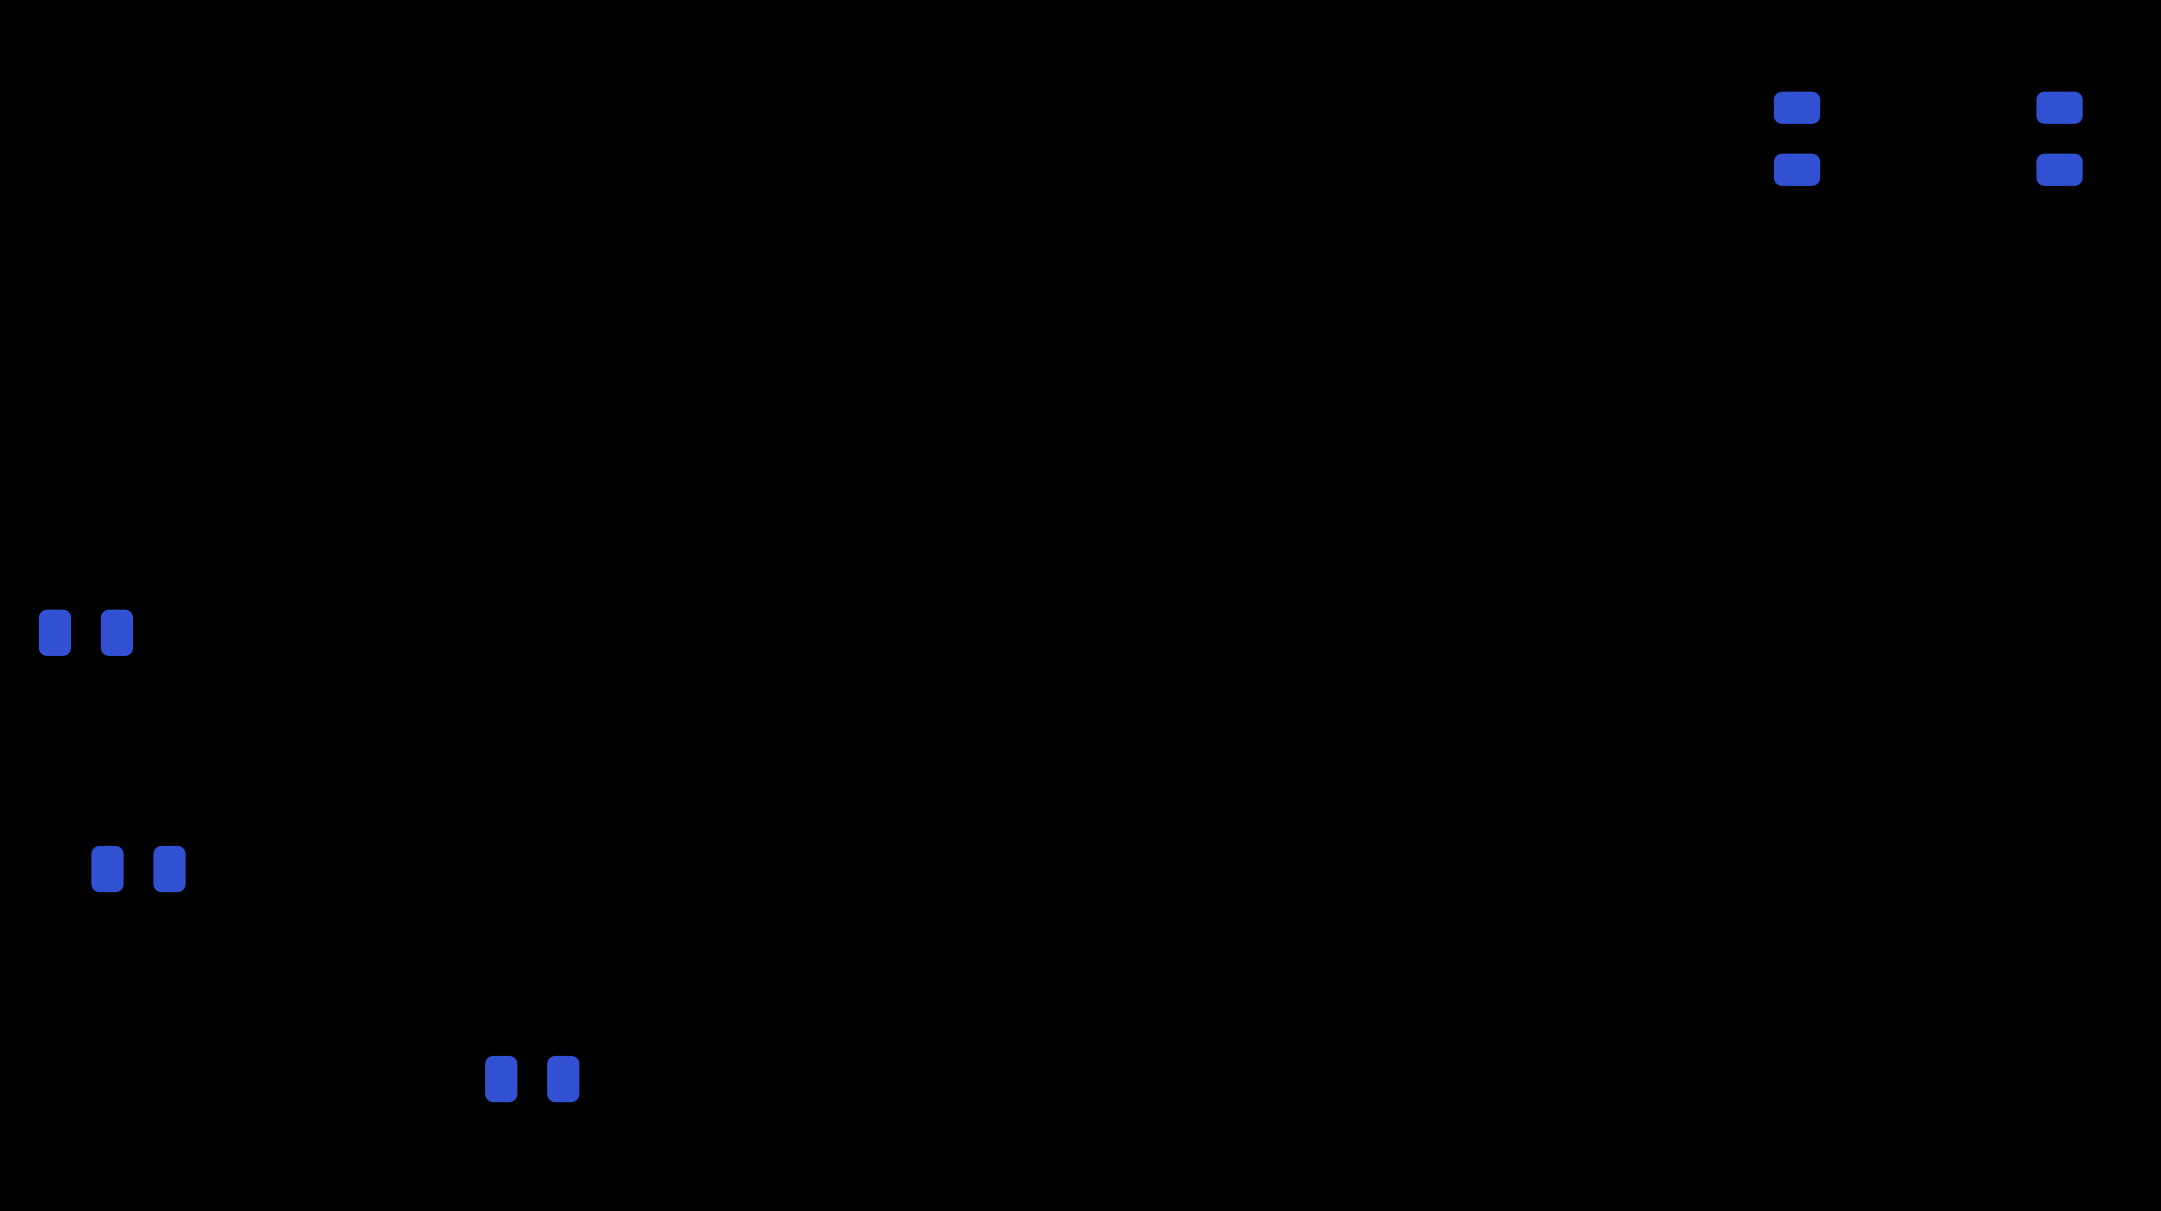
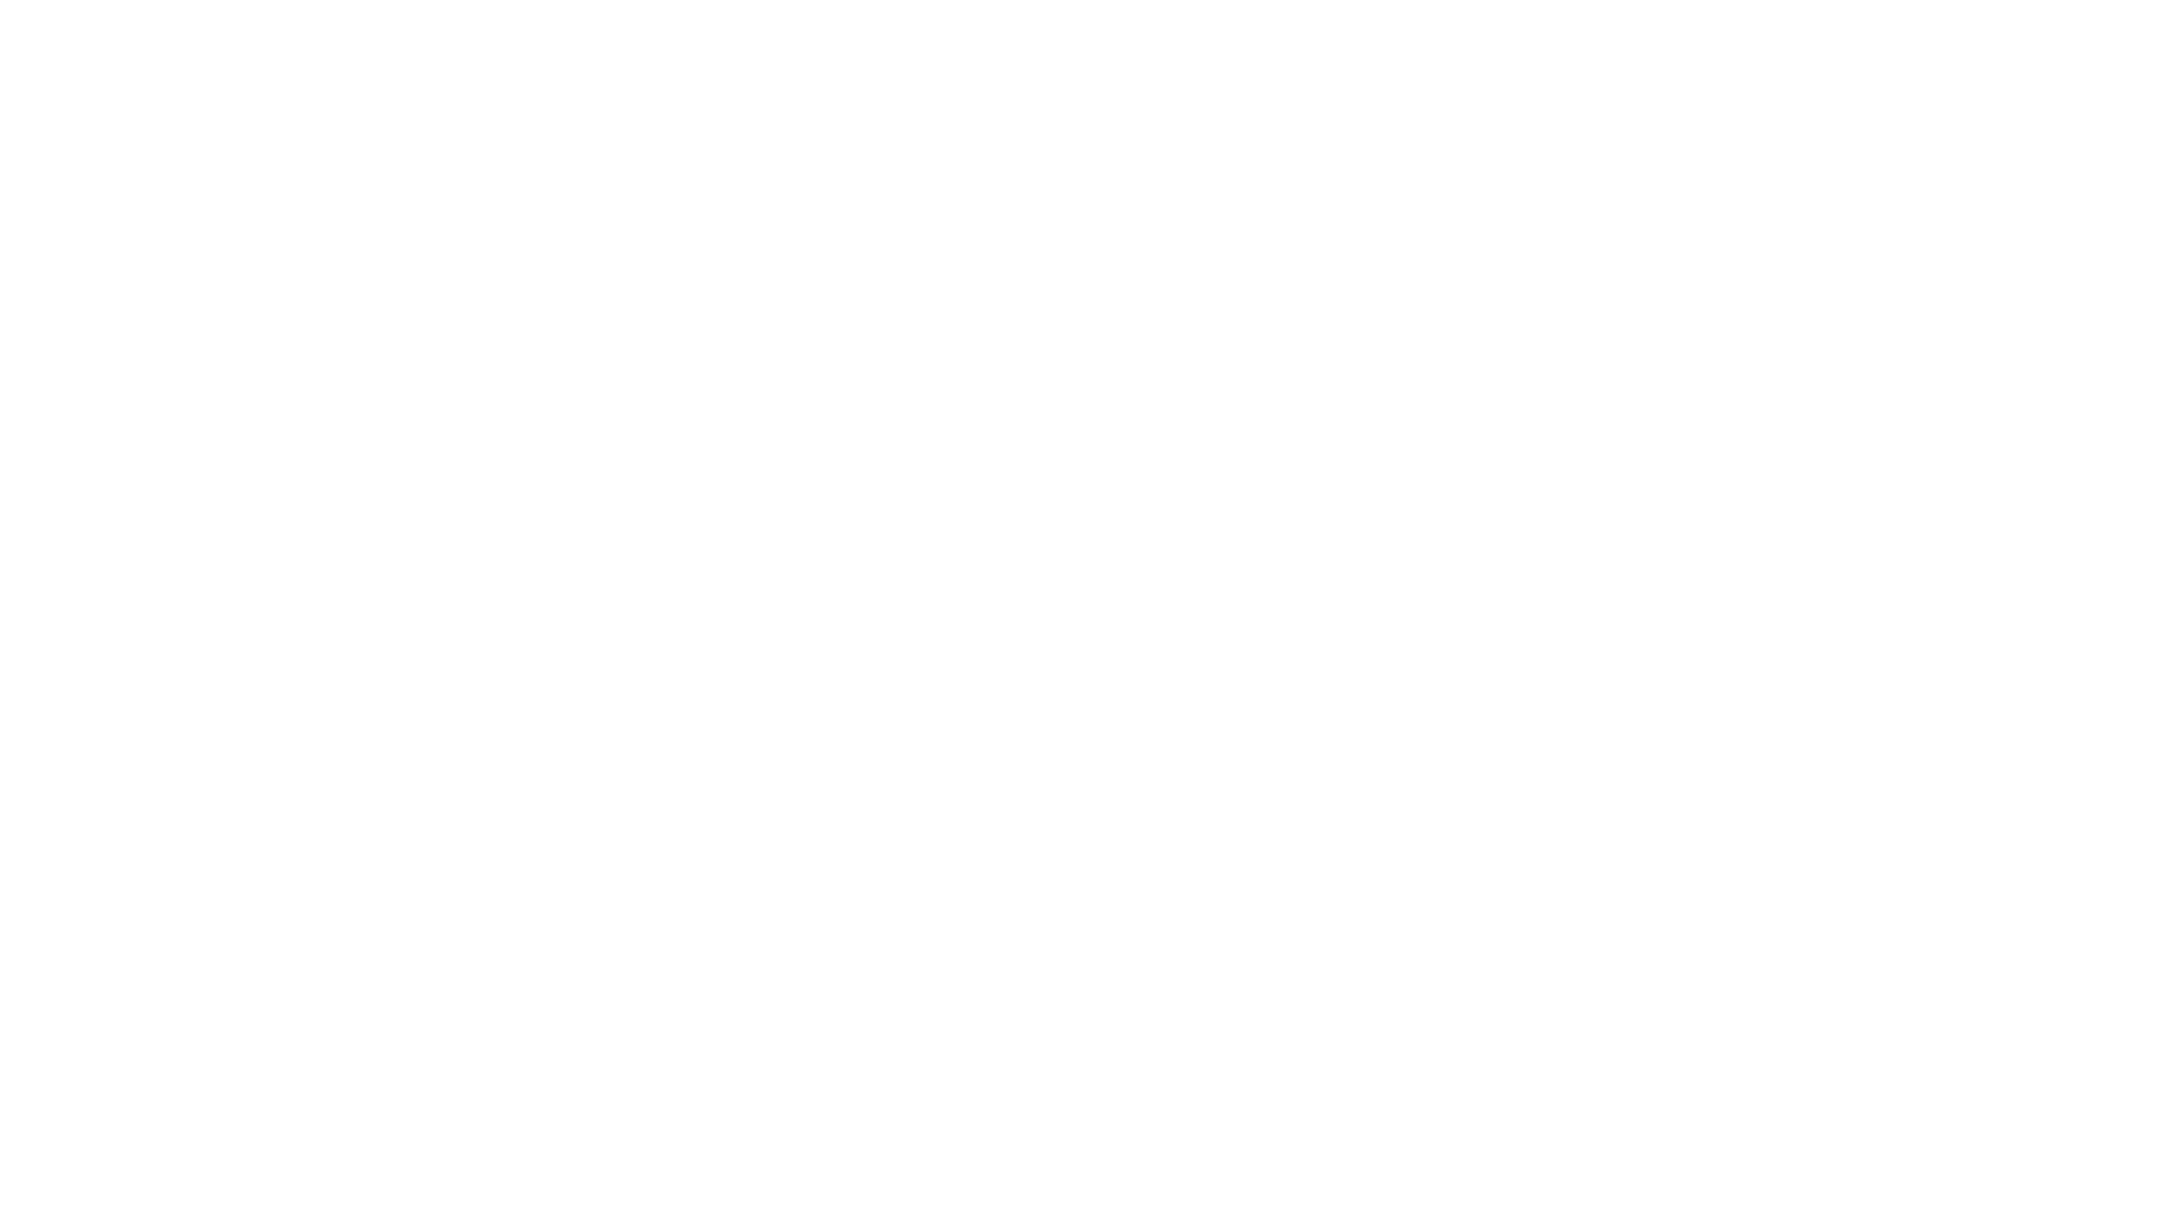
part: (1797, 138) -> none
part: (2059, 138) -> none
part: (85, 632) -> none
part: (138, 869) -> none
part: (532, 1079) -> none

